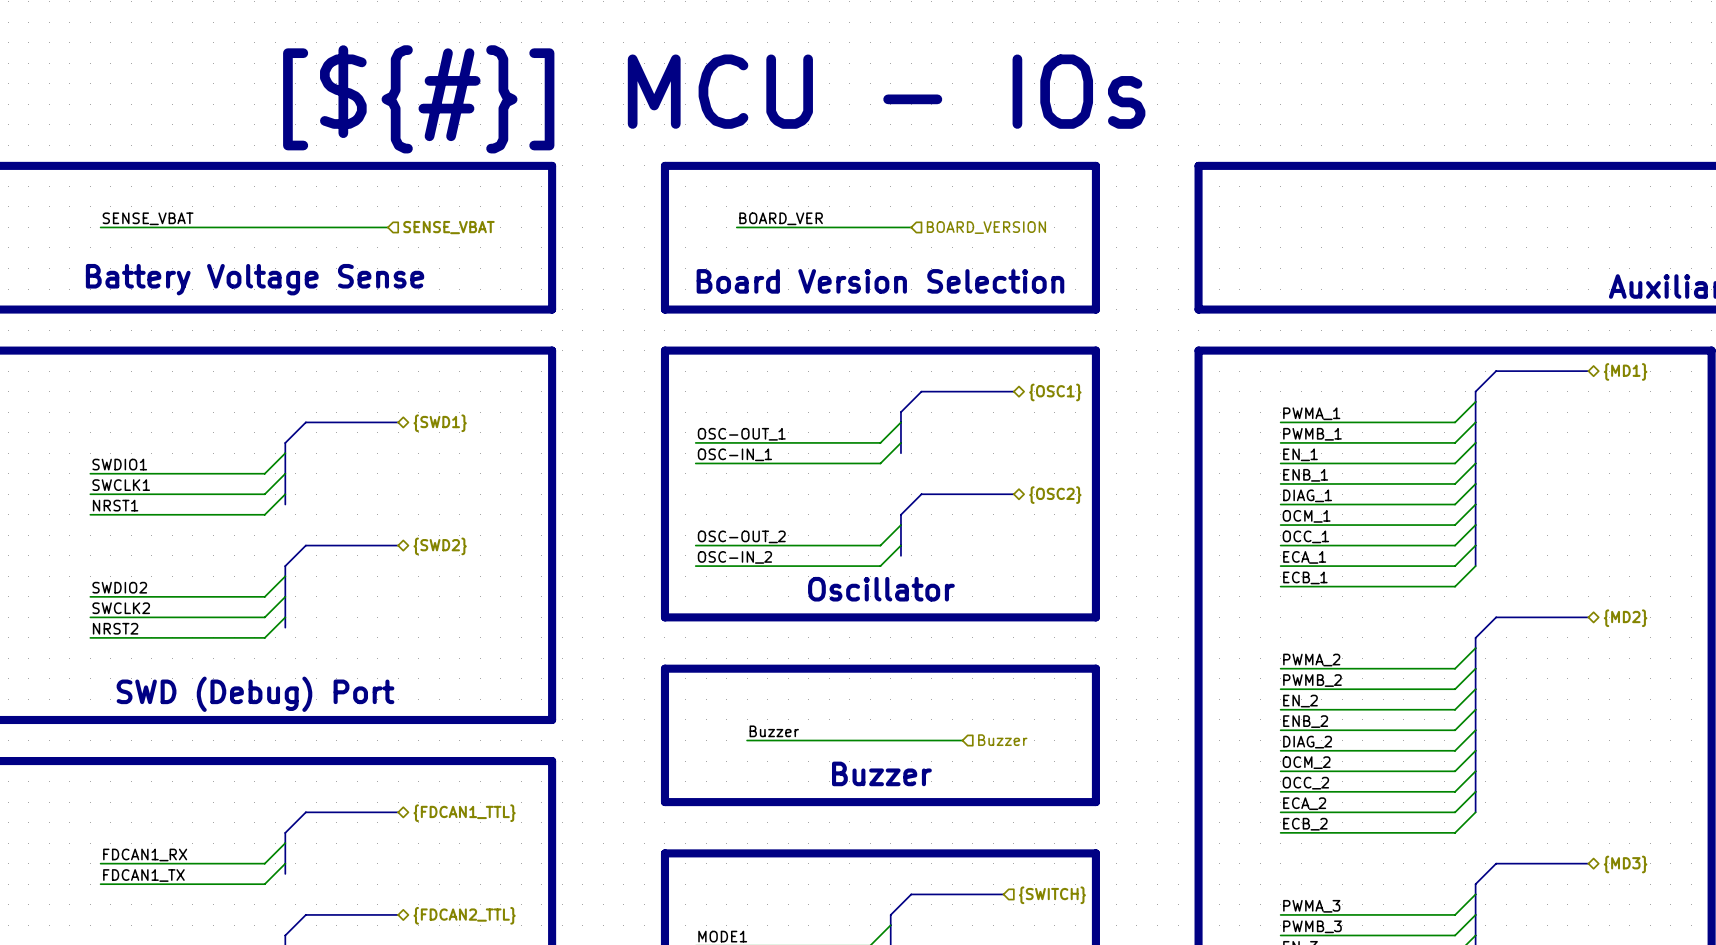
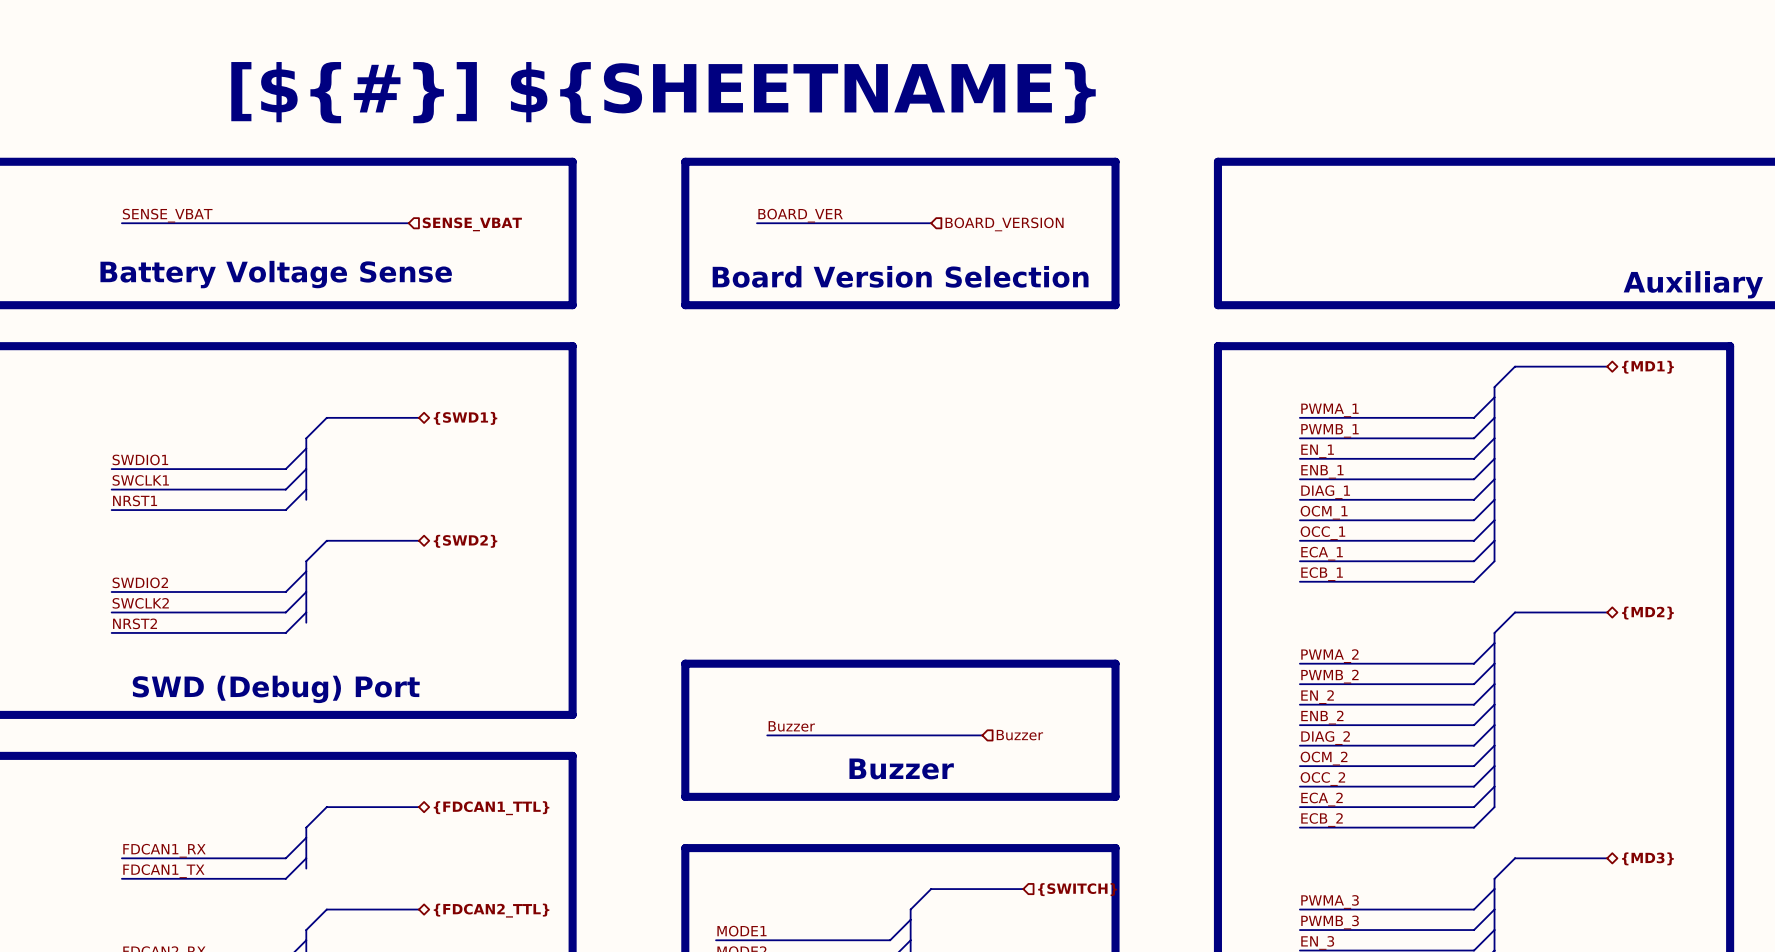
text: none -> [${#}] ${SHEETNAME} (663, 92)
text: [${#}] MCU - IOs (714, 99) -> none
line: (664, 350) (1095, 350) (1095, 617) (664, 617) (664, 350) -> none
bus: (1013, 391) (921, 391) (900, 412) (900, 453) -> none
hierarchical label: {OSC1} (1055, 392) -> none
wire: (900, 422) (880, 442) (695, 442) -> none
label: OSC-OUT_1 (741, 434) -> none
wire: (900, 442) (880, 463) (695, 463) -> none
label: OSC-IN_1 (734, 454) -> none
bus: (1013, 494) (921, 494) (900, 514) (900, 555) -> none
hierarchical label: {OSC2} (1055, 495) -> none
wire: (900, 525) (880, 545) (695, 545) -> none
label: OSC-OUT_2 (741, 536) -> none
wire: (900, 545) (880, 566) (695, 566) -> none
label: OSC-IN_2 (734, 557) -> none
text: Oscillator (881, 589) -> none

